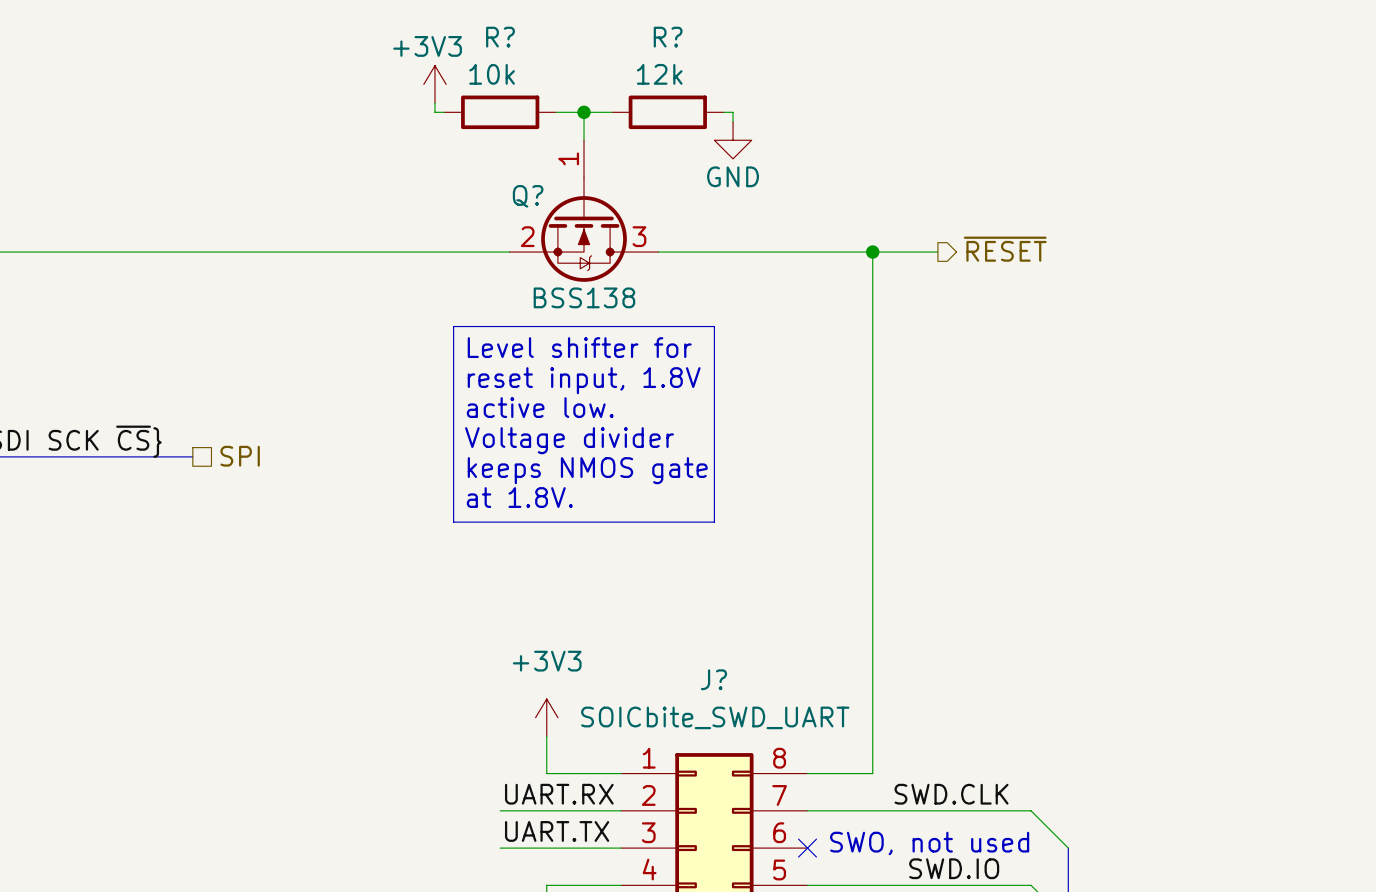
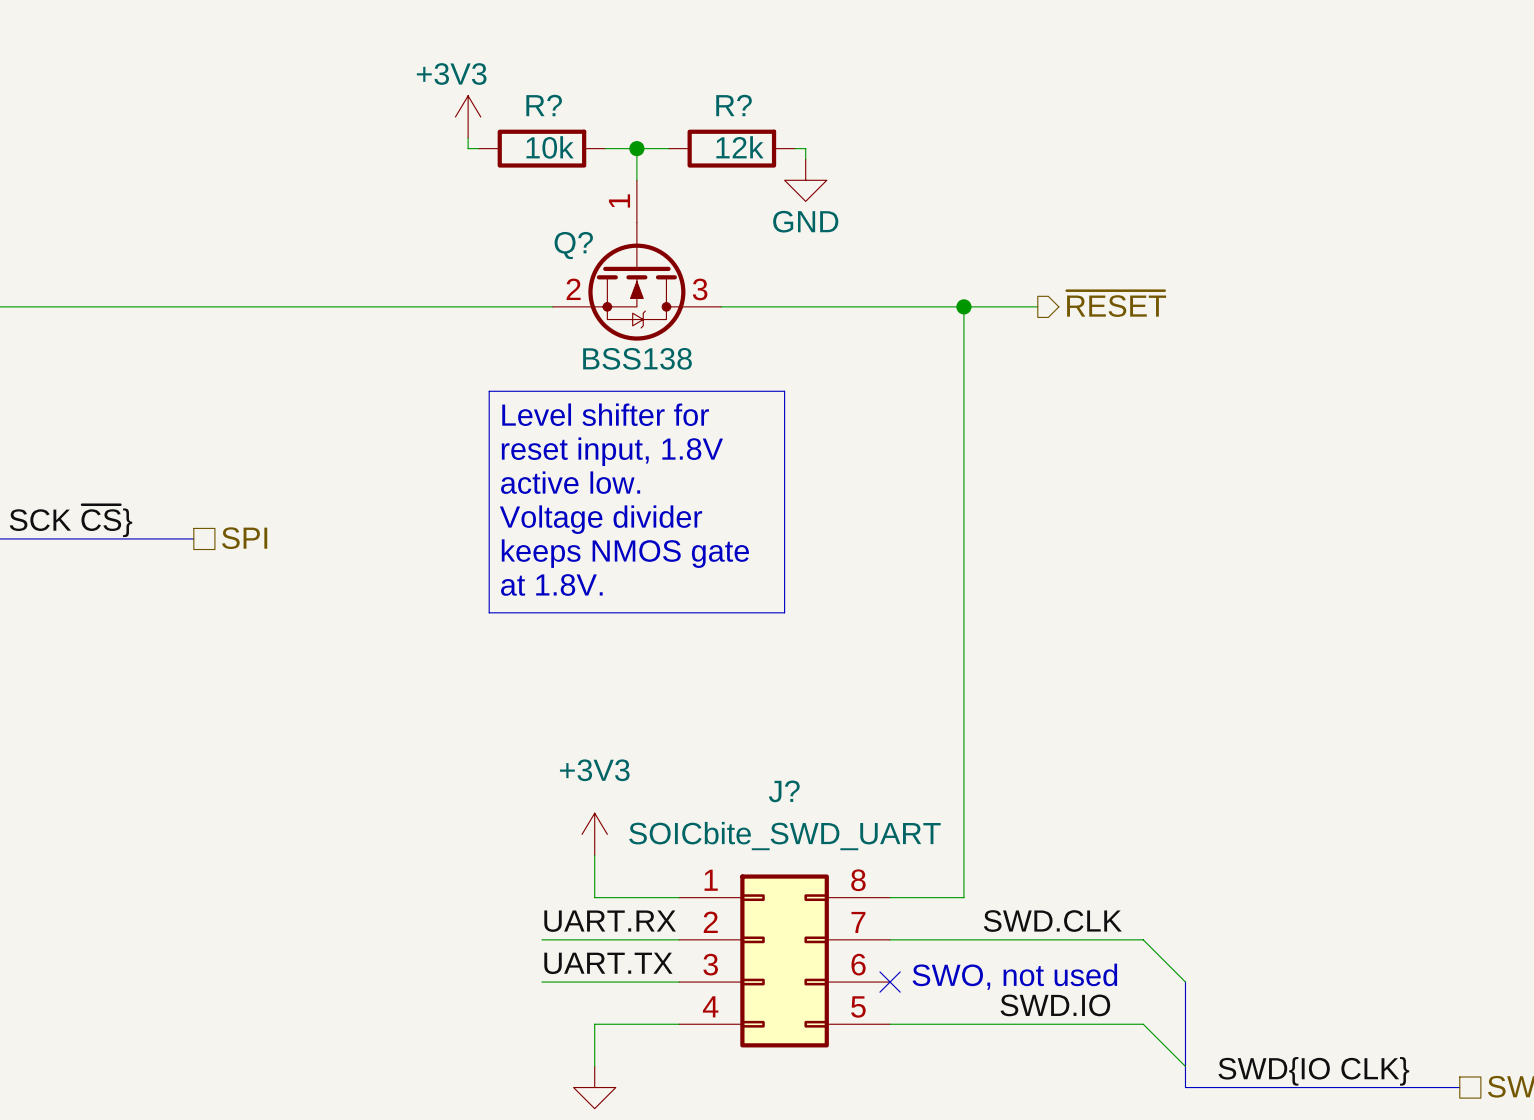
R? name position: R? (500, 37) -> R? (544, 105)
R? name position: R? (668, 37) -> R? (734, 105)
R? value position: 10k (492, 74) -> 10k (550, 147)
R? value position: 12k (659, 74) -> 12k (739, 147)

